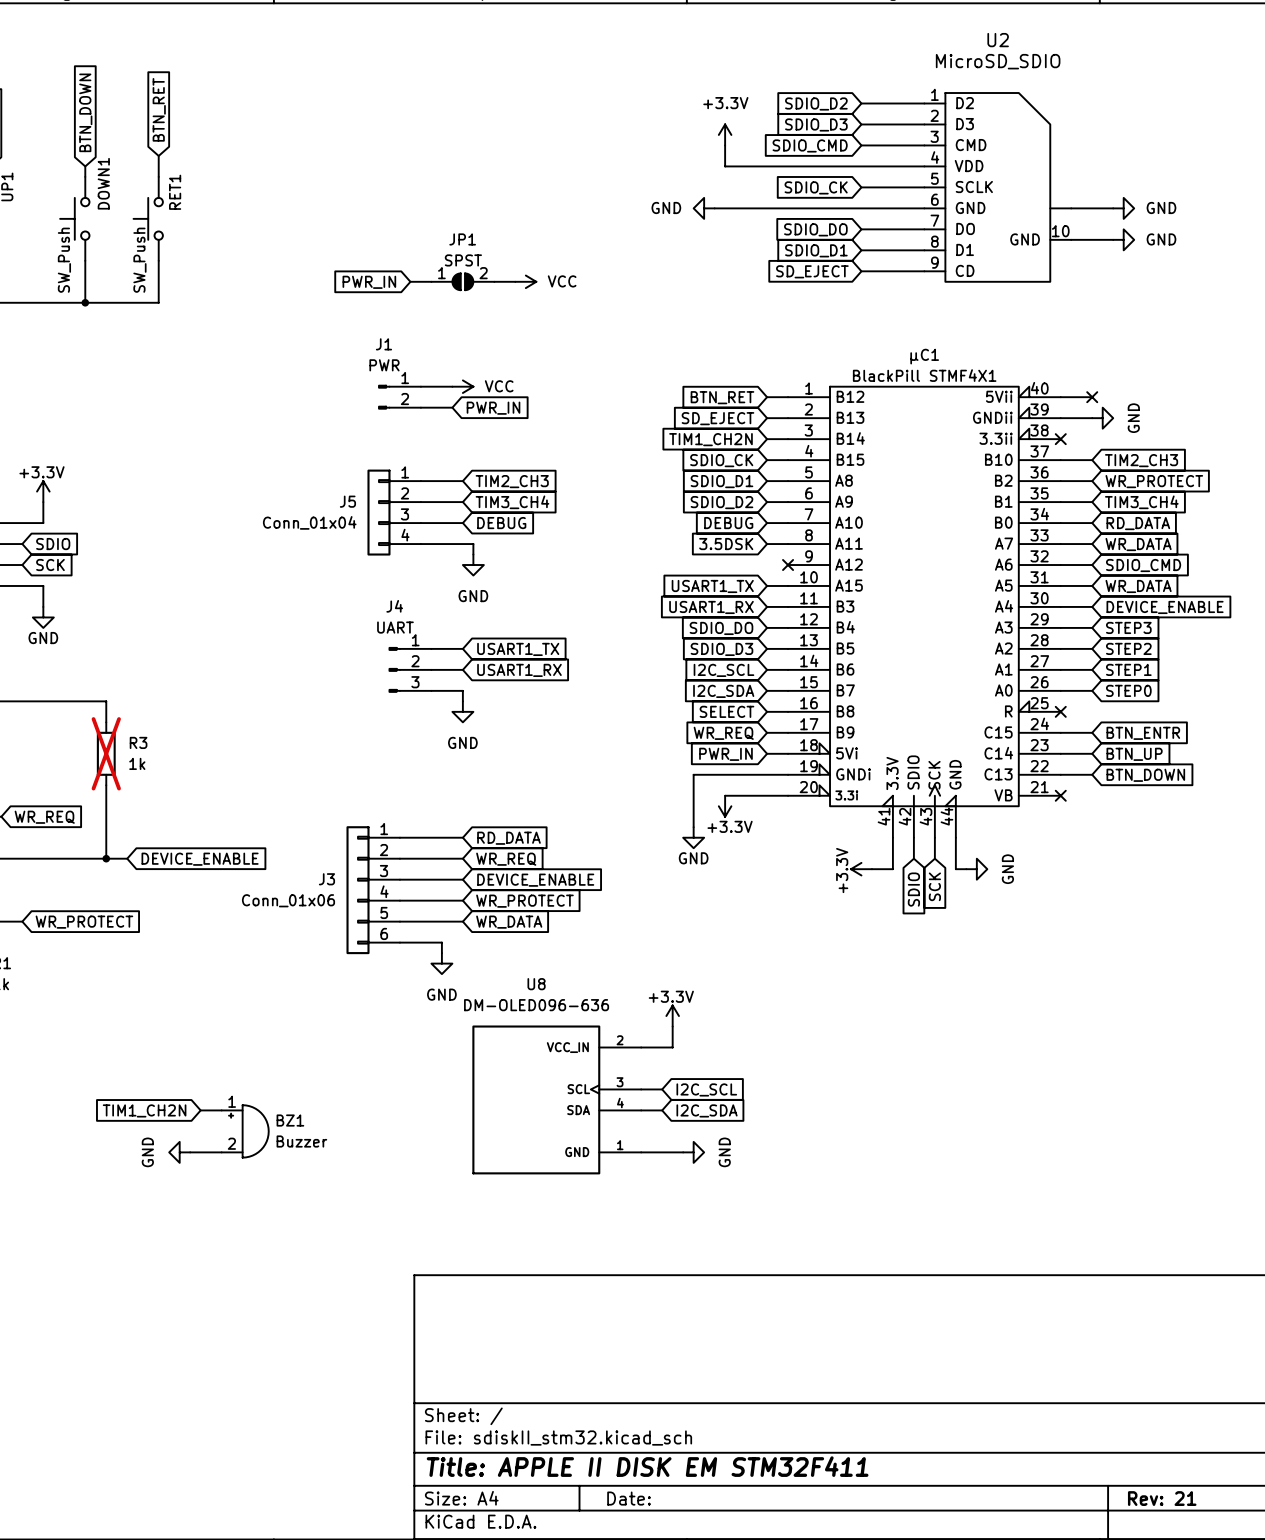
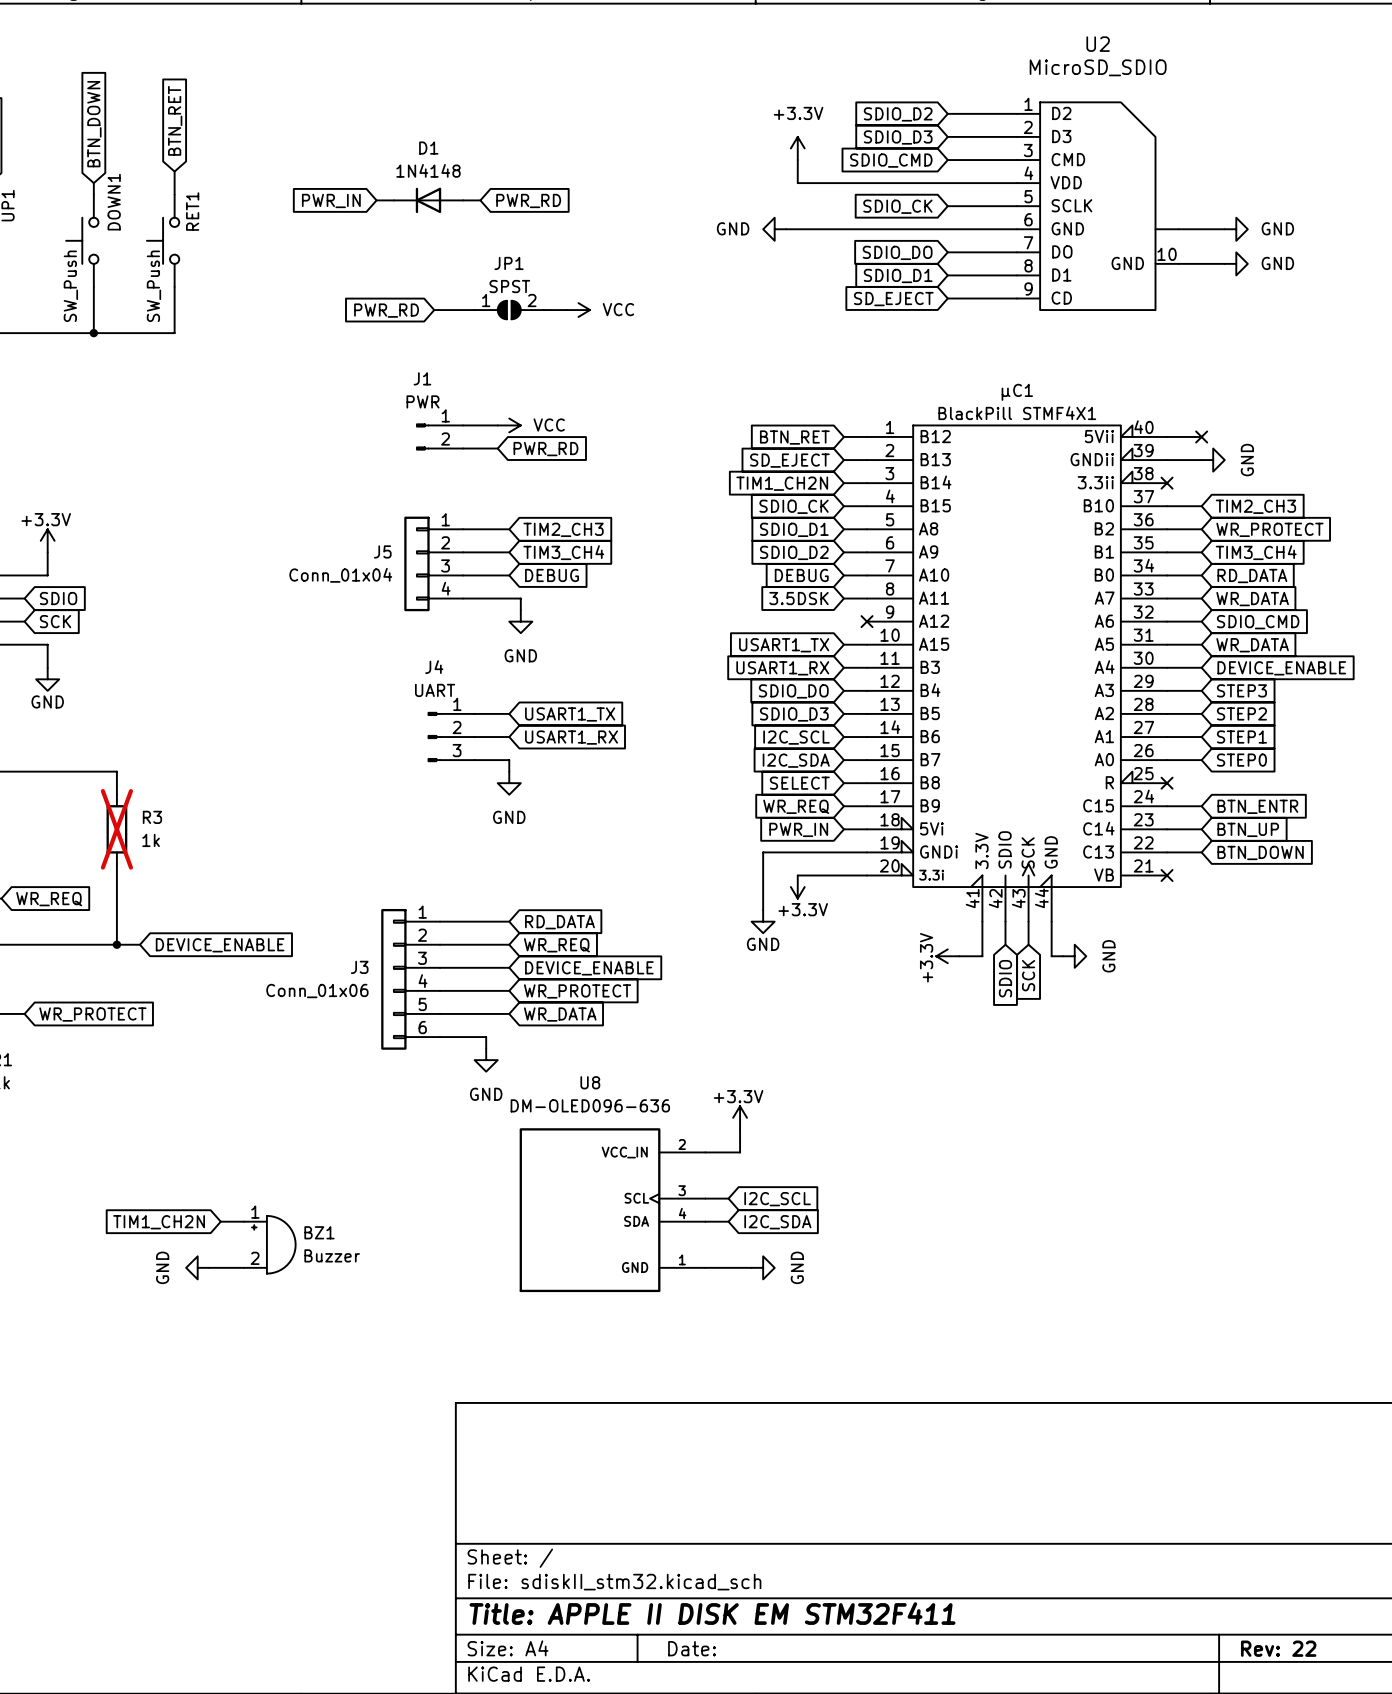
wire: none -> (376, 200) (393, 200)
D1: none -> 1N4148 (428, 200)
wire: none -> (463, 200) (480, 200)
global label: none -> PWR_RD (528, 200)
wire: none -> (434, 310) (451, 310)
global label: none -> PWR_RD (386, 310)
global label position: PWR_IN (369, 282) -> PWR_IN (331, 200)
global label: PWR_IN (493, 408) -> PWR_RD (545, 449)
title block: Rev: 21 (1162, 1498) -> Rev: 22 (1278, 1648)

